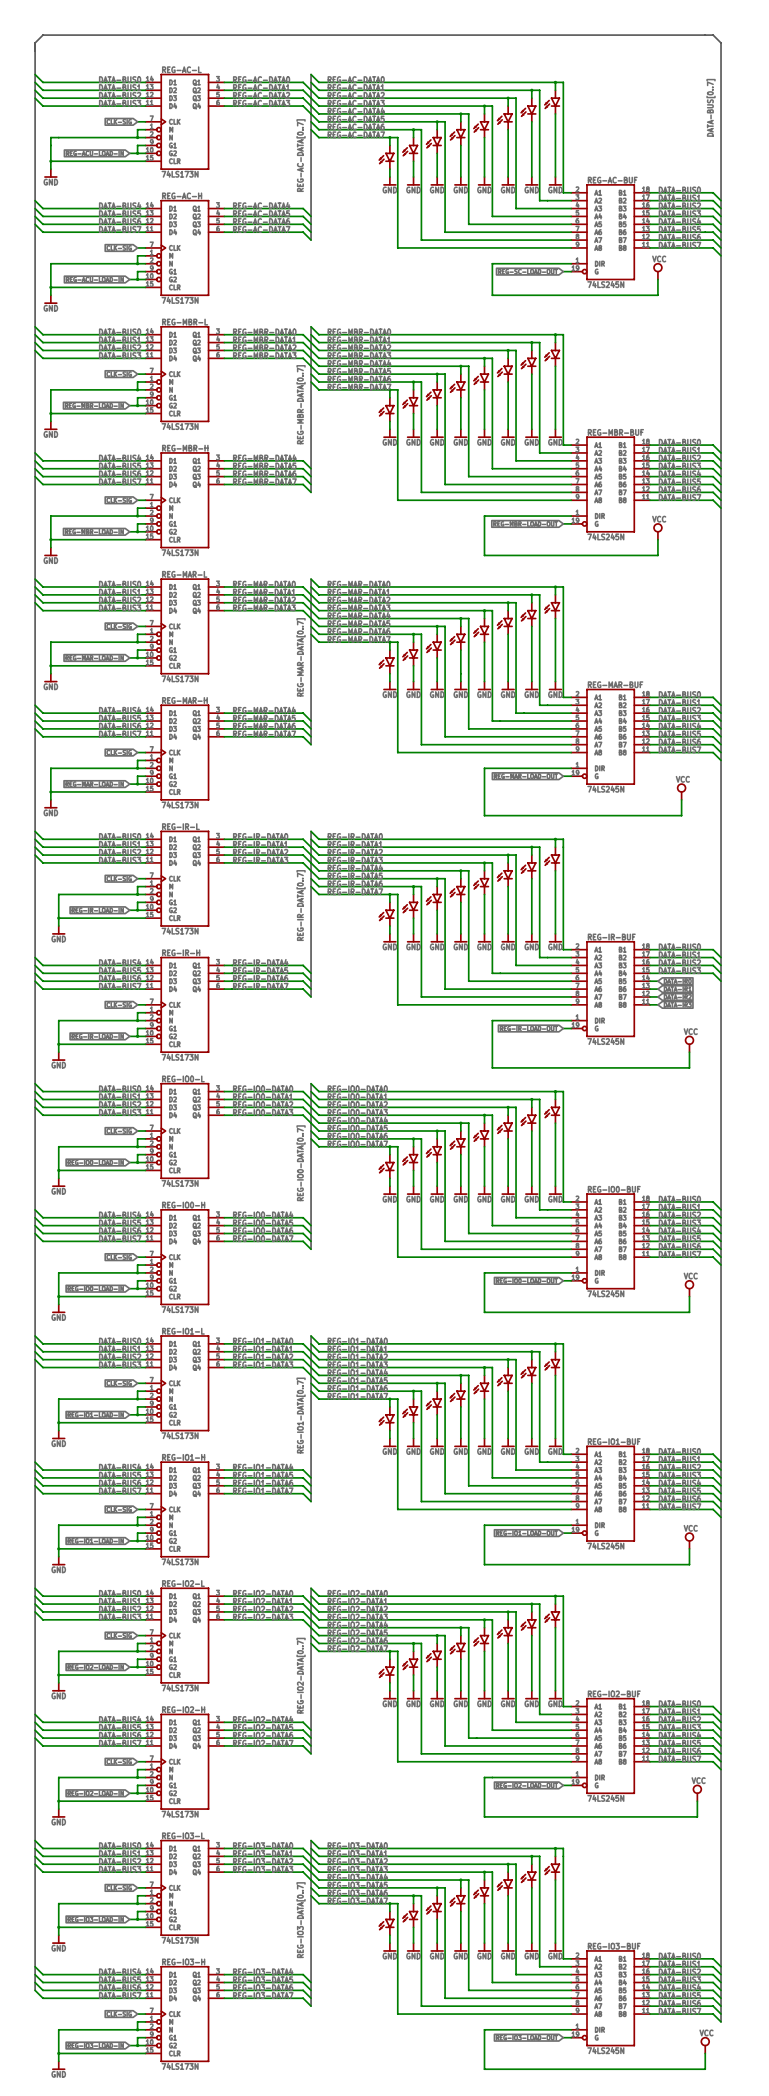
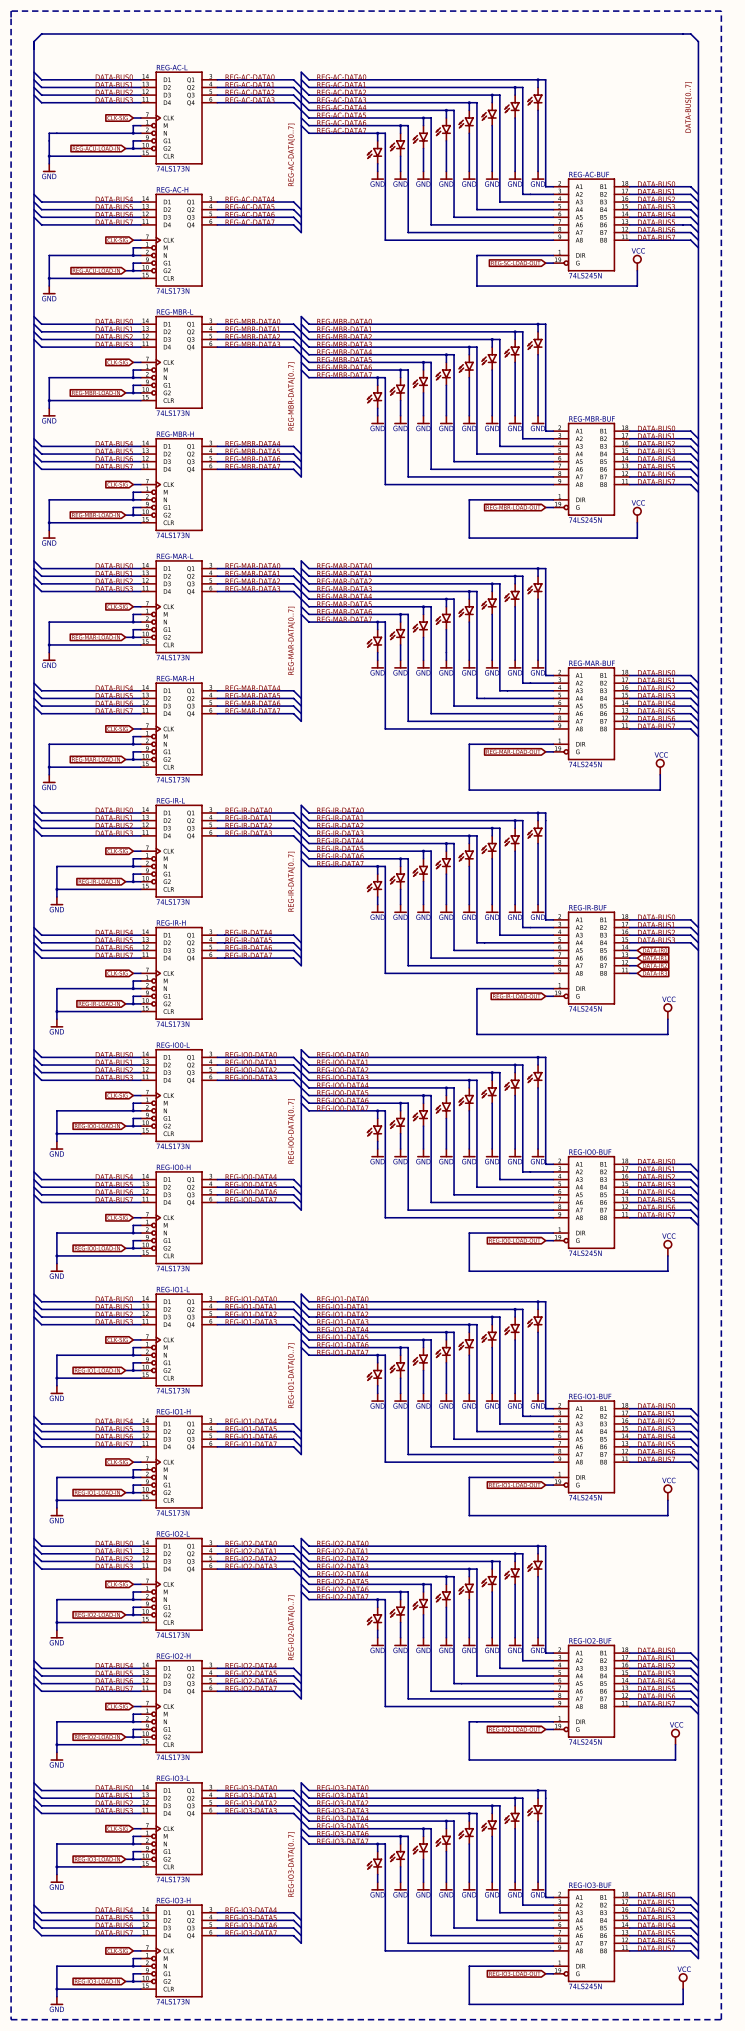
line: none -> (11, 11) (11, 2019) (721, 2019) (721, 11) (11, 11)

